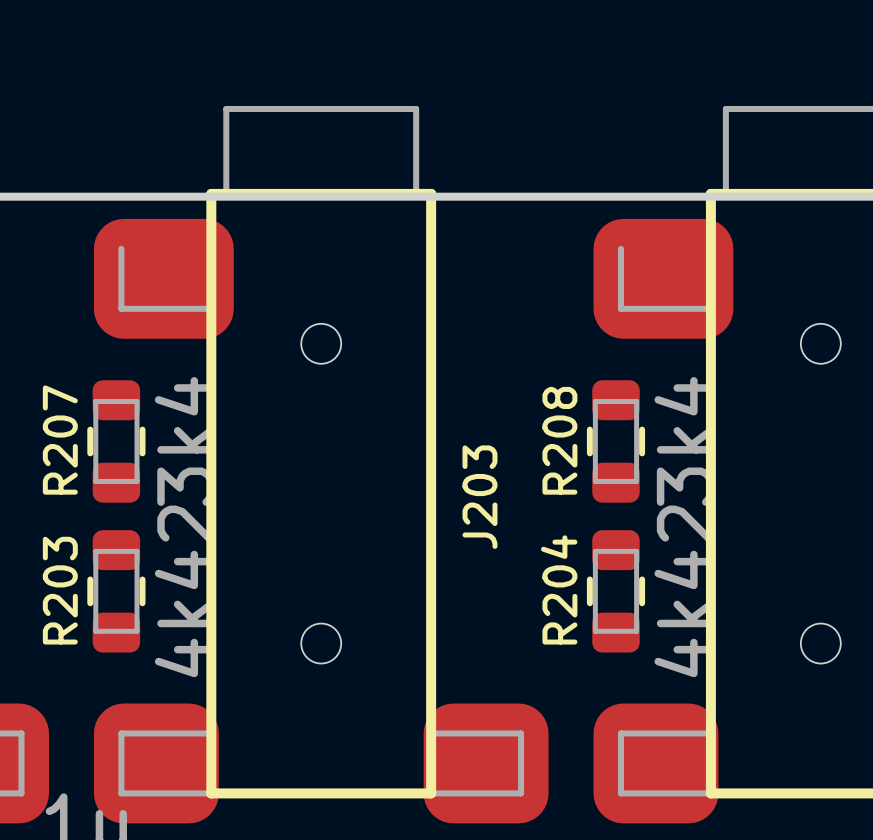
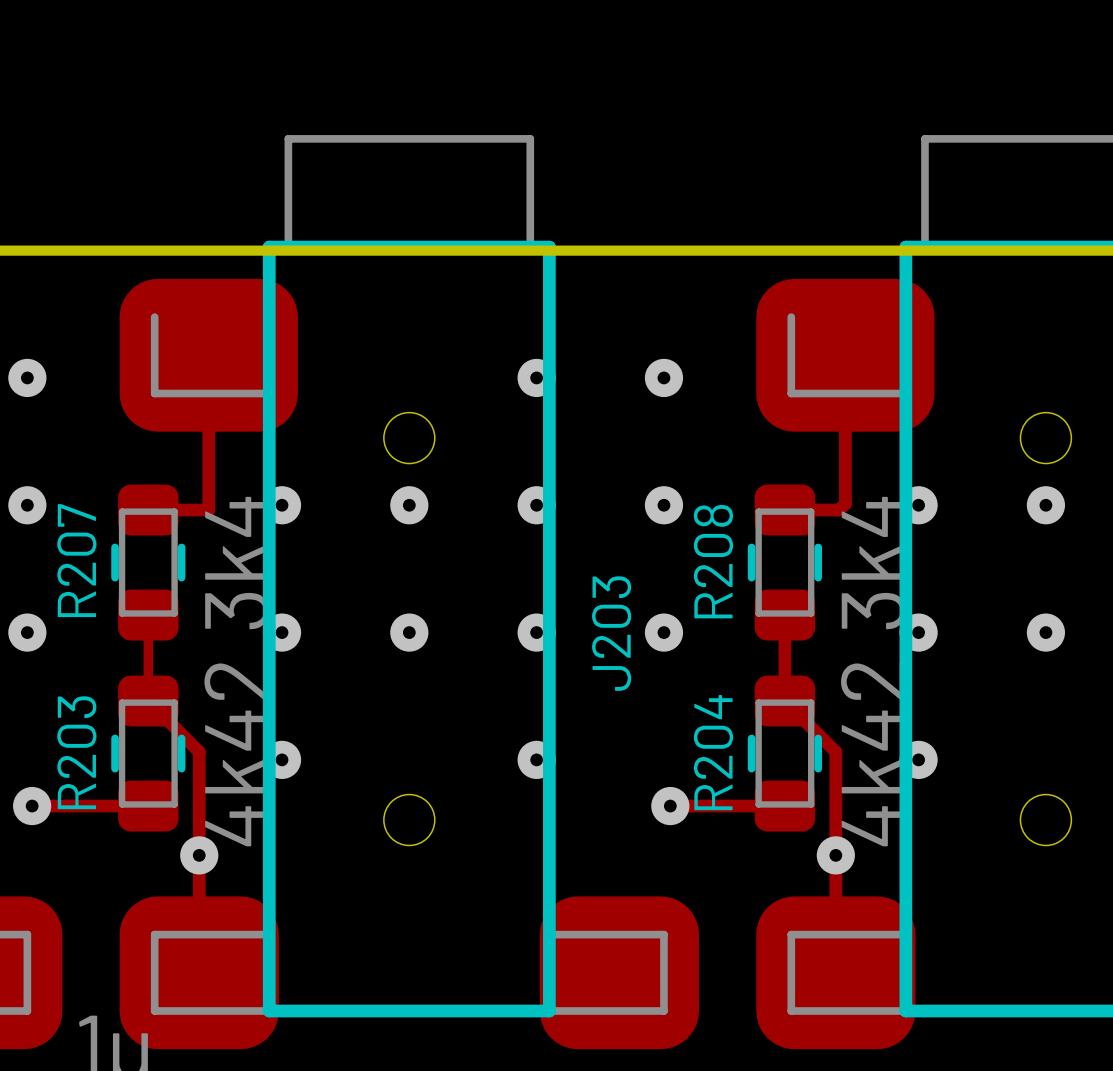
track: none -> (208, 355) (208, 510) (148, 510)
track: none -> (845, 355) (845, 503) (839, 510) (784, 510)
via: none -> (27, 377)
via: none -> (536, 377)
via: none -> (663, 377)
via: none -> (27, 505)
via: none -> (282, 505)
via: none -> (409, 505)
via: none -> (536, 505)
via: none -> (663, 505)
via: none -> (918, 505)
via: none -> (1045, 505)
track: none -> (148, 615) (148, 701) (199, 751) (199, 972)
track: none -> (784, 615) (784, 701) (835, 751) (835, 972)
via: none -> (27, 632)
via: none -> (282, 632)
via: none -> (409, 632)
via: none -> (536, 632)
via: none -> (663, 632)
via: none -> (918, 632)
via: none -> (1045, 632)
via: none -> (282, 759)
via: none -> (536, 759)
via: none -> (918, 759)
track: none -> (32, 806) (148, 806)
via: none -> (32, 806)
track: none -> (670, 806) (784, 806)
via: none -> (670, 806)
via: none -> (199, 855)
via: none -> (835, 855)

